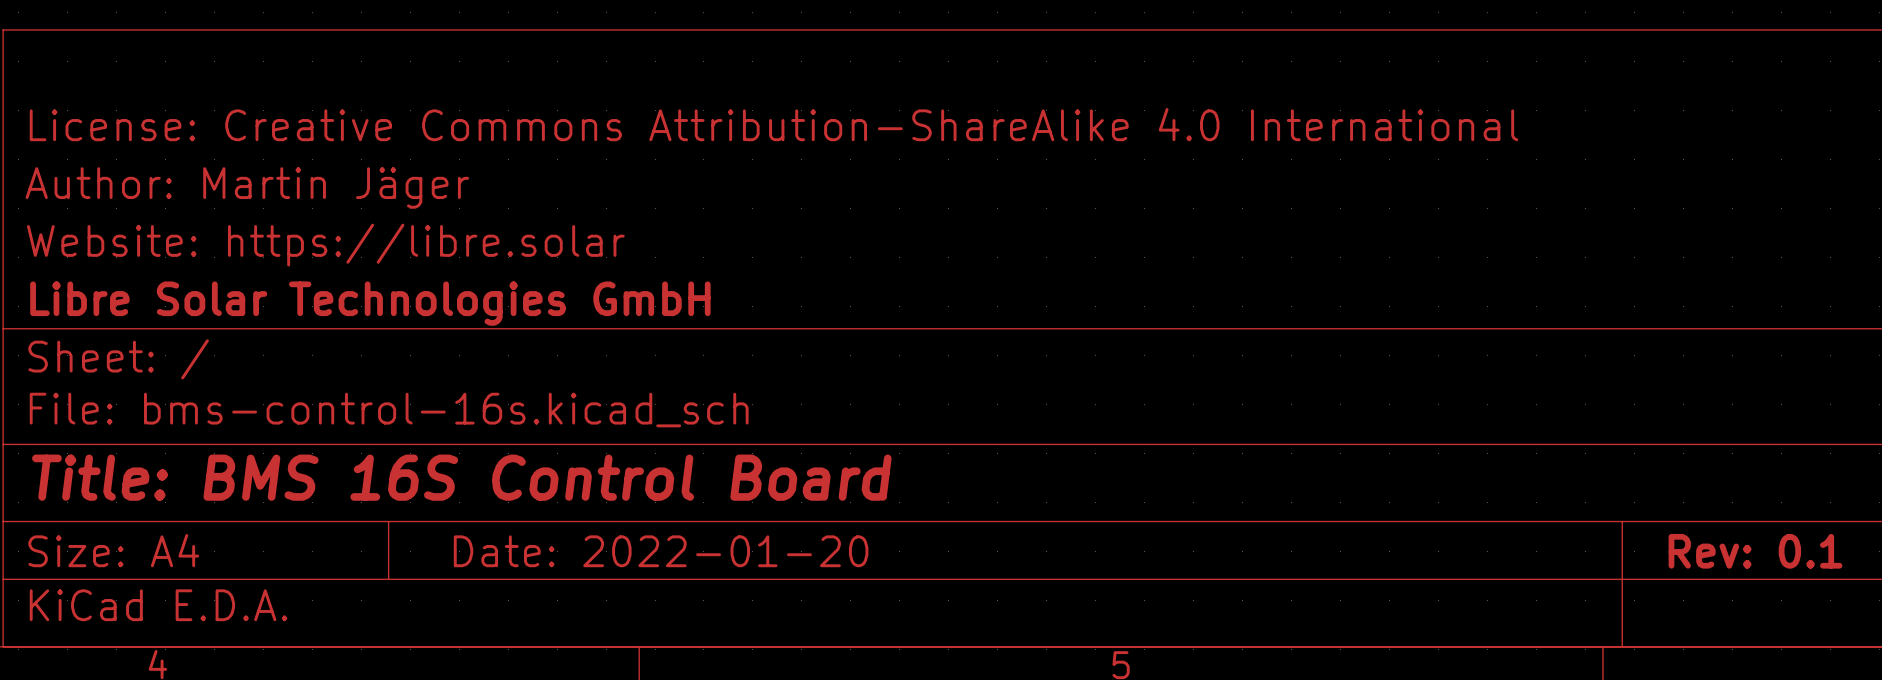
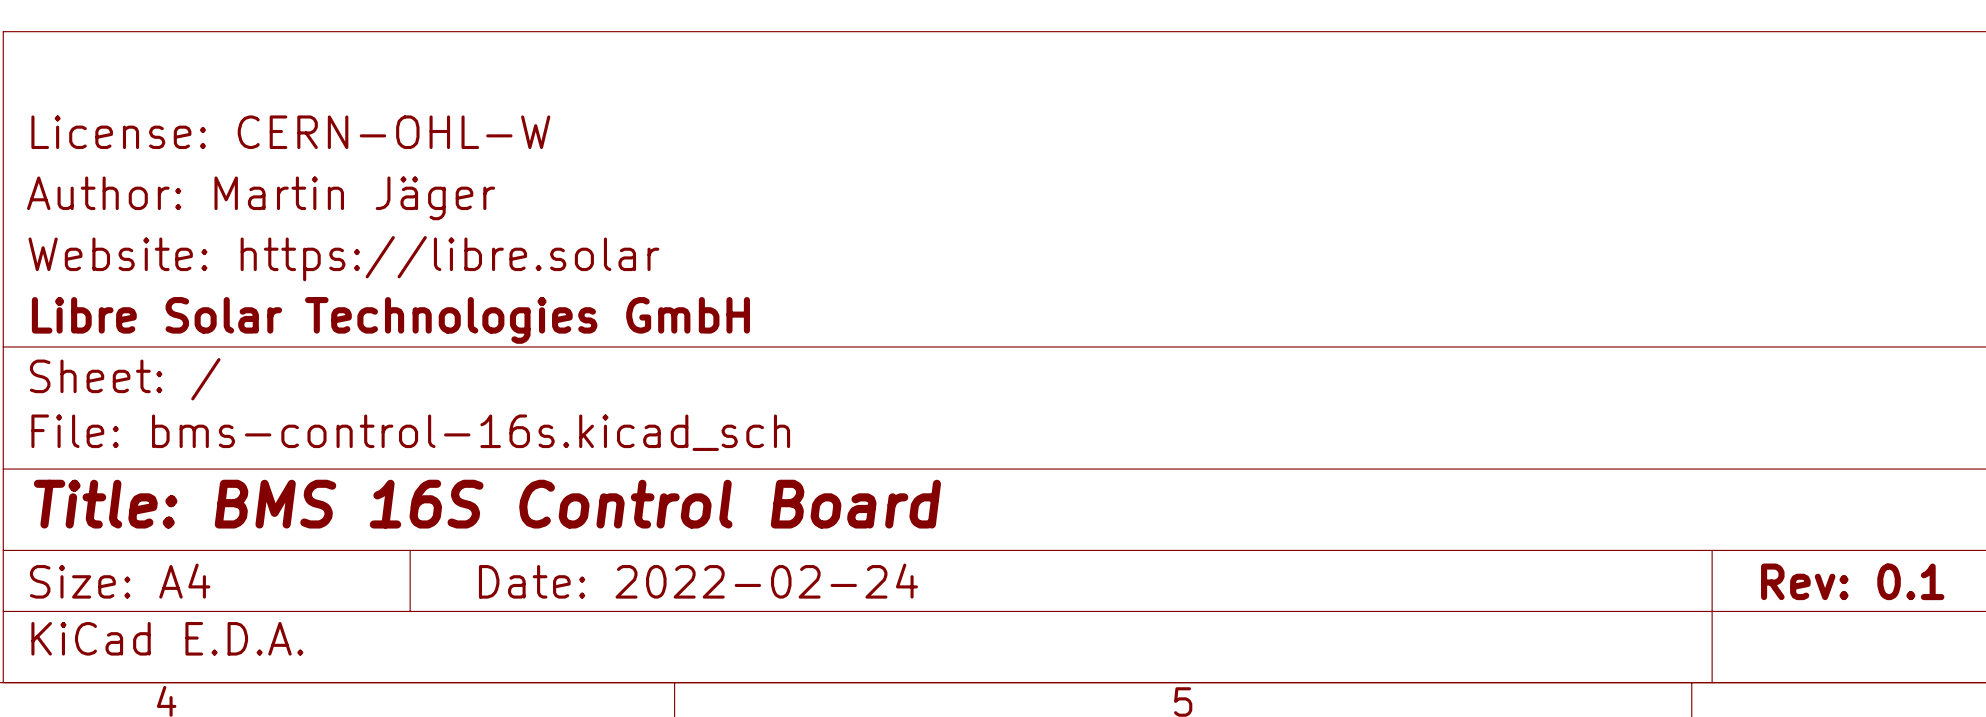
title block: License: Creative Commons Attribution-ShareAlike 4.0 International (774, 124) -> License: CERN-OHL-W (290, 132)
title block: Date: 2022-01-20 (661, 551) -> Date: 2022-02-24 (698, 581)

